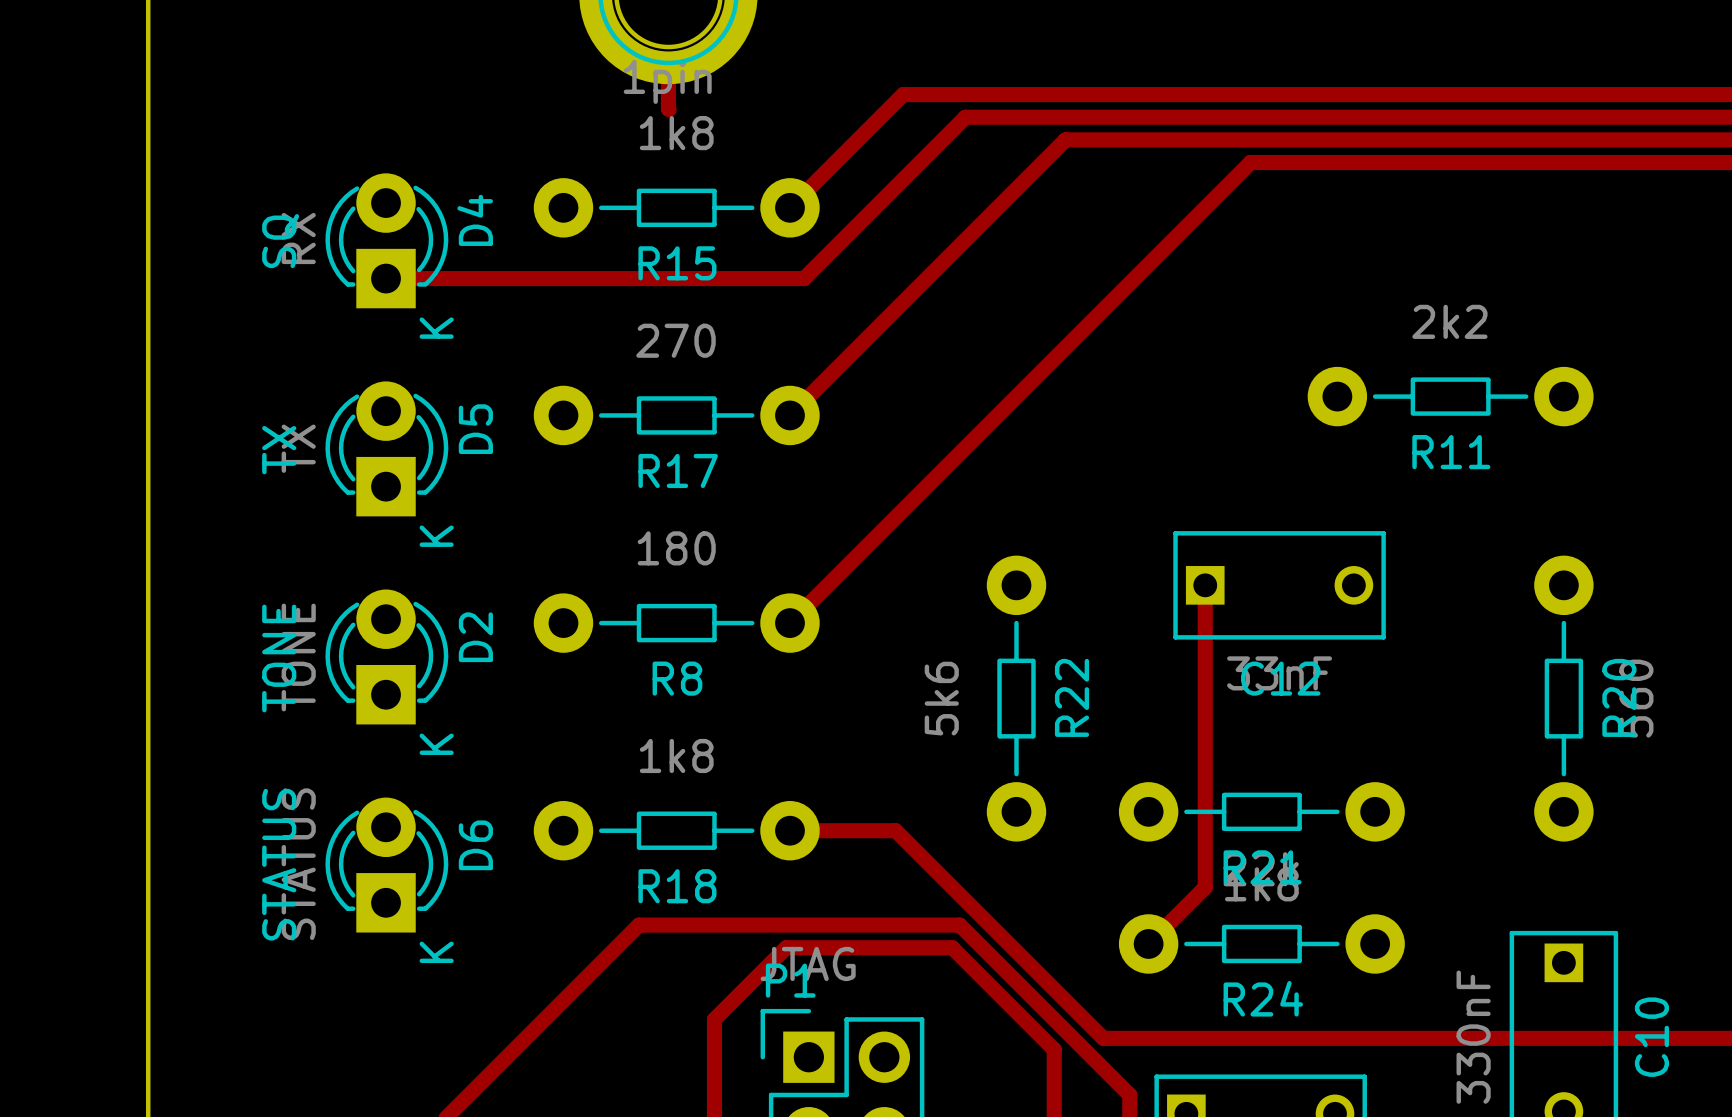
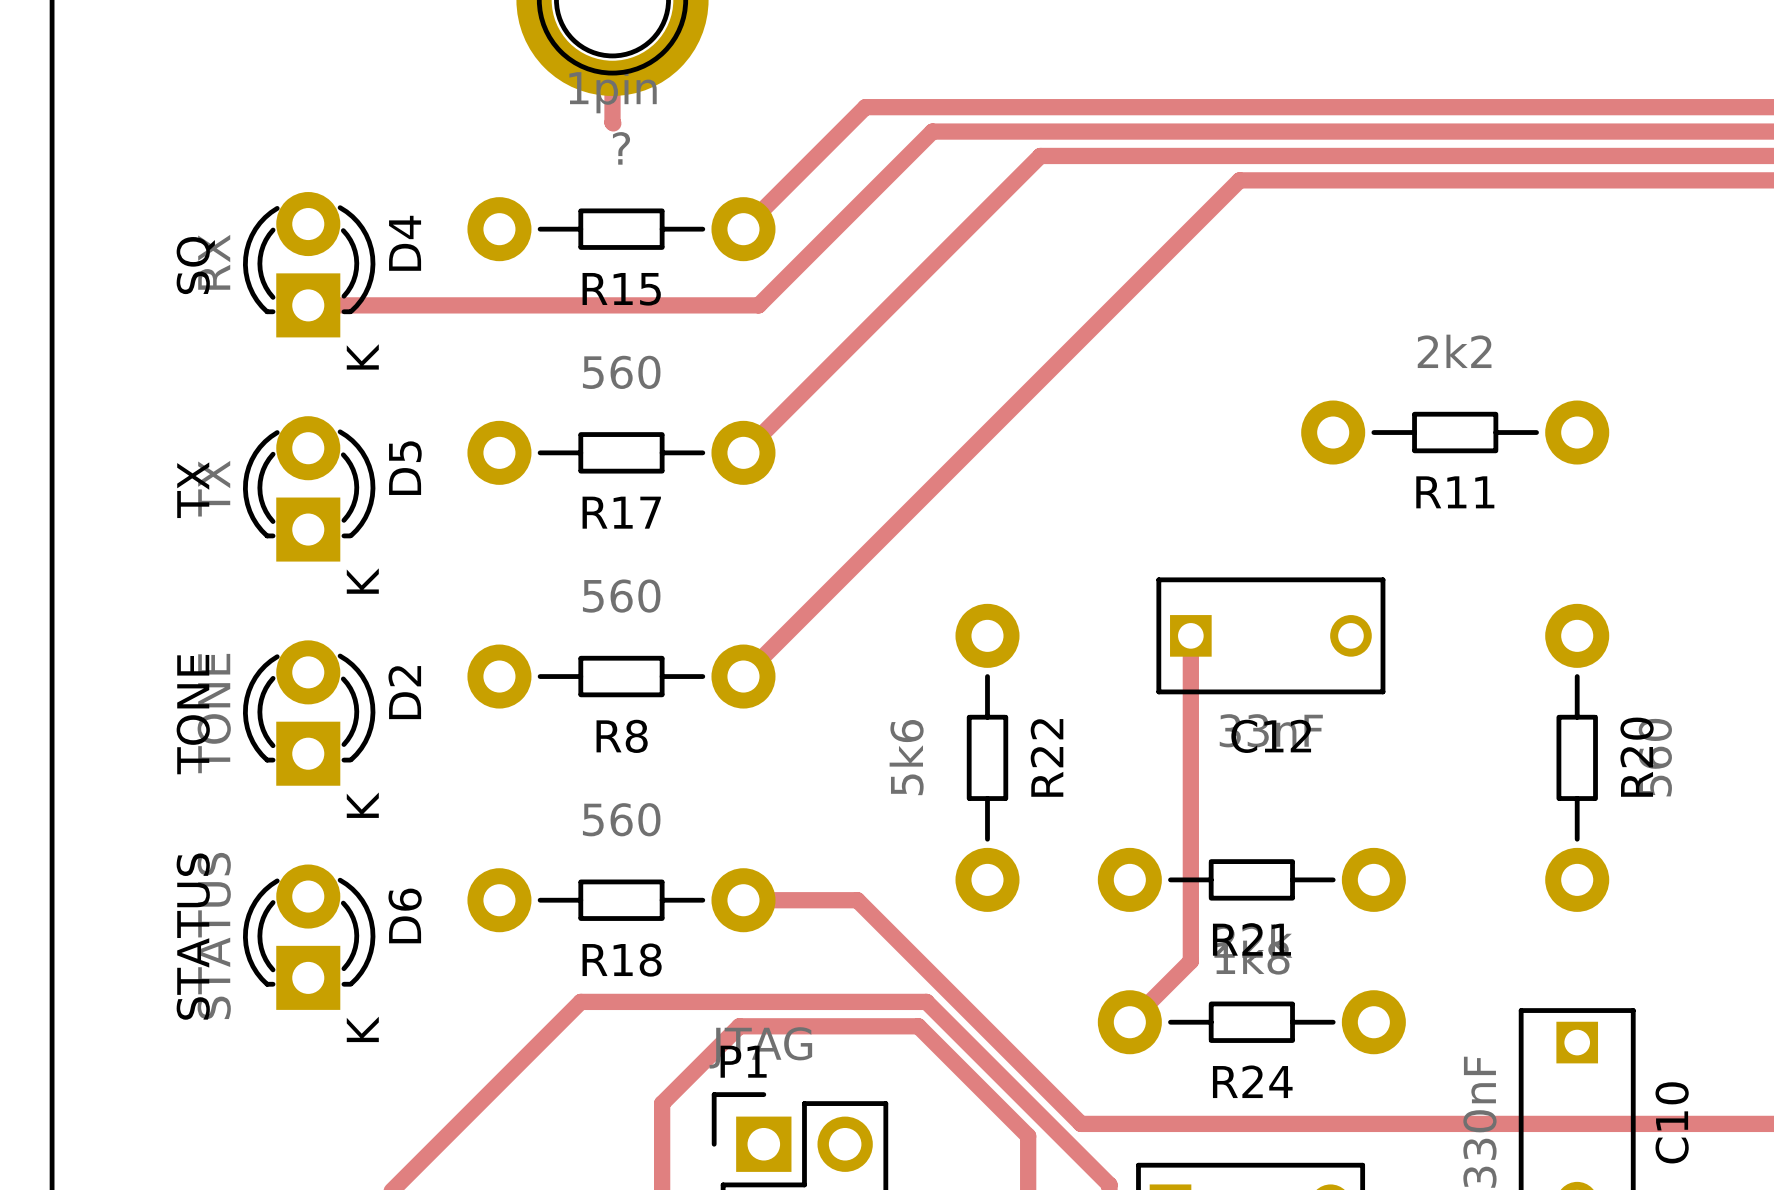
R15 value: 1k8 (676, 133) -> ? (621, 148)
R17 value: 270 (676, 340) -> 560 (621, 372)
R8 value: 180 (676, 548) -> 560 (621, 596)
R18 value: 1k8 (676, 755) -> 560 (621, 819)

